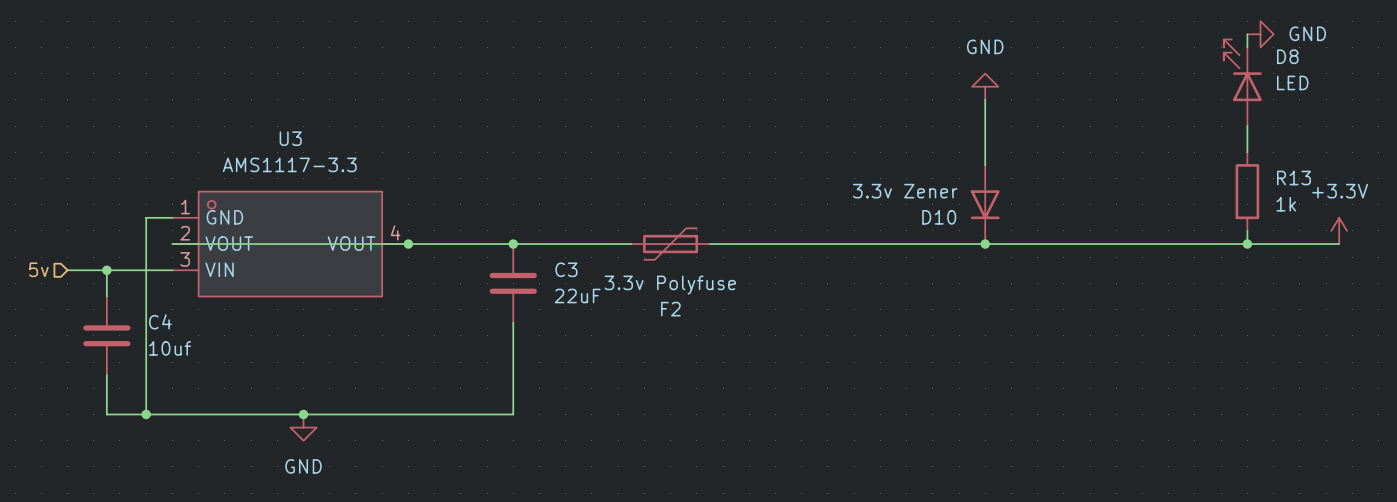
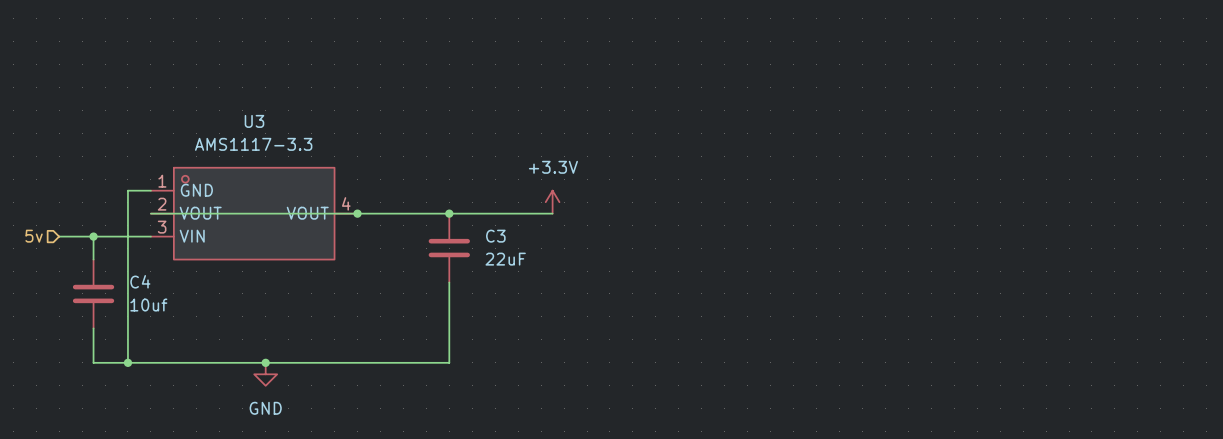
wire: (1247, 34) (1247, 47) -> none
power symbol: GND (1260, 34) -> none
D8: LED (1242, 82) -> none
power symbol: GND (985, 86) -> none
wire: (985, 99) (985, 165) -> none
wire: (1247, 126) (1247, 152) -> none
R13: 1k (1247, 191) -> none
D10: 3.3v Zener (985, 204) -> none
power symbol: none -> +3.3V (552, 202)
wire: (1247, 230) (1247, 244) -> none
power symbol: +3.3V (1339, 230) -> none
F2: 3.3v Polyfuse (670, 244) -> none
wire: (709, 244) (1339, 244) -> none
junction: (985, 244) -> none
junction: (1247, 244) -> none

